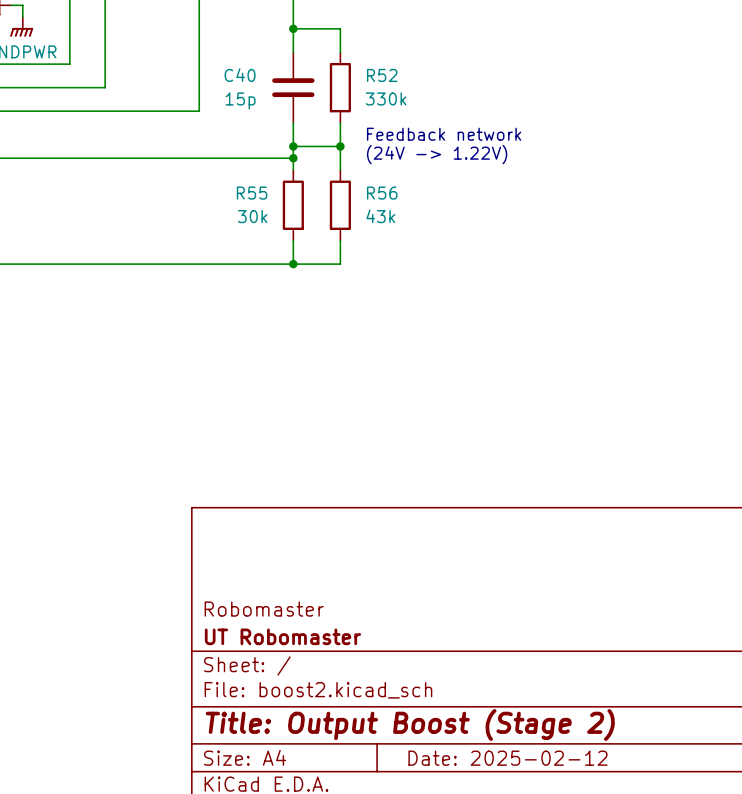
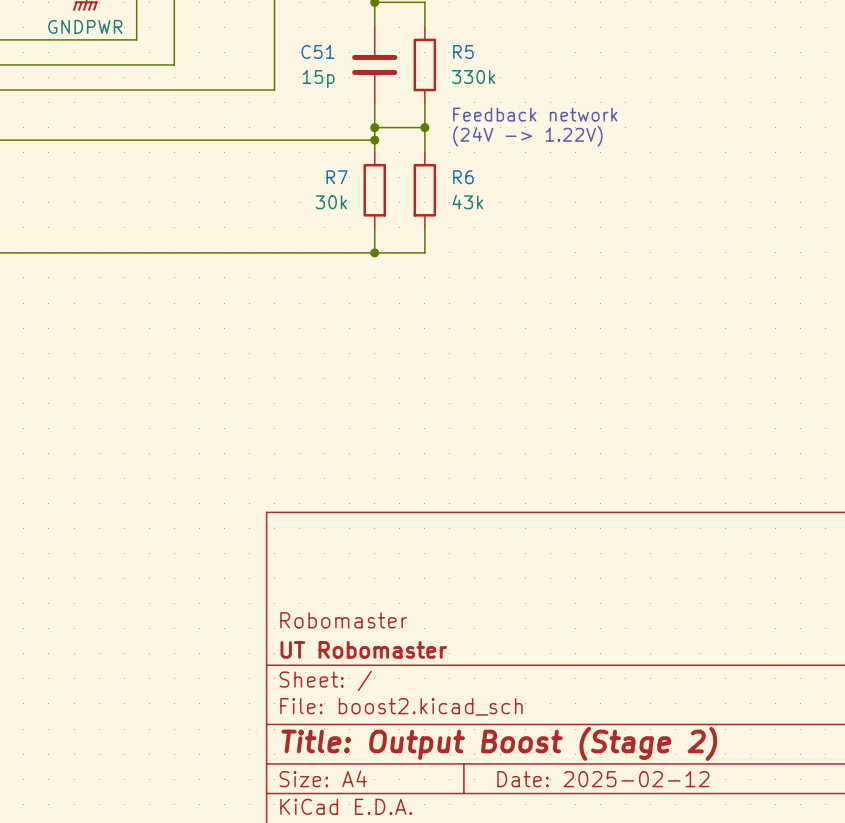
C40 name: C40 (240, 75) -> C51 (317, 51)
R52 name: R52 (382, 75) -> R5 (463, 51)
R55 name: R55 (252, 193) -> R7 (337, 177)
R56 name: R56 (382, 193) -> R6 (463, 177)

